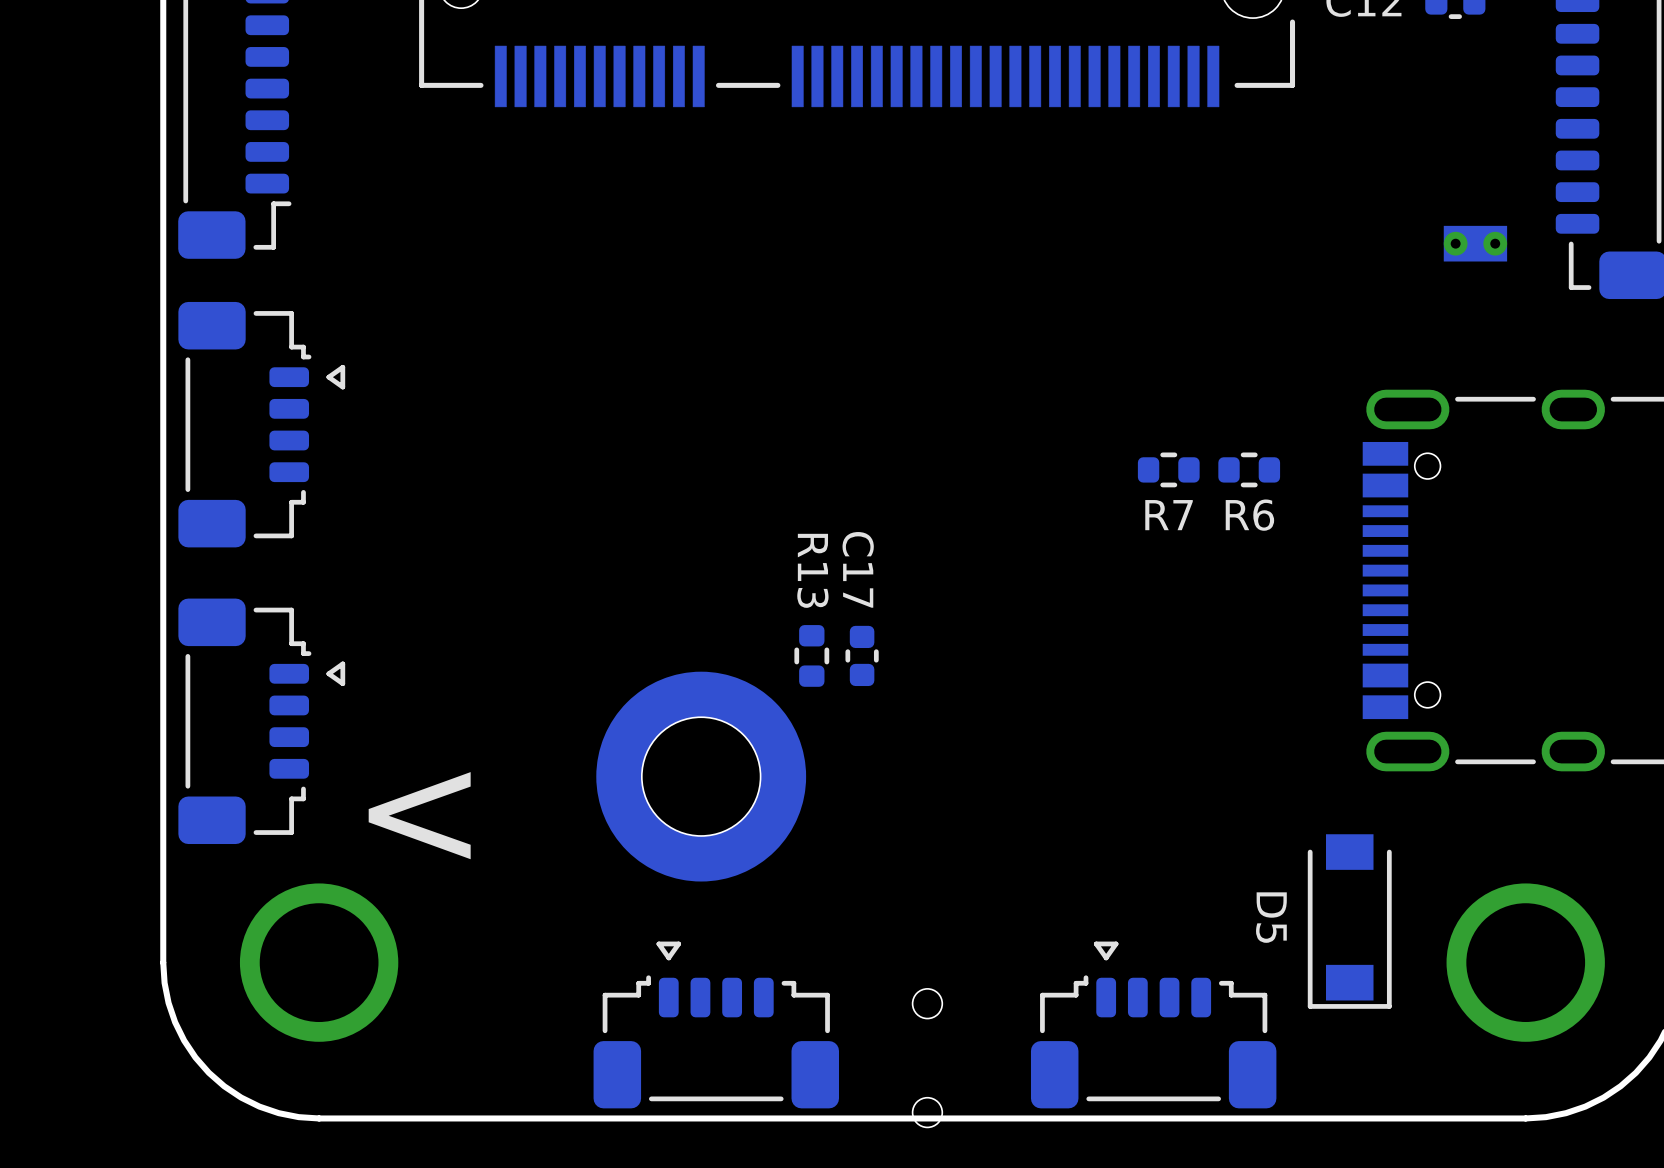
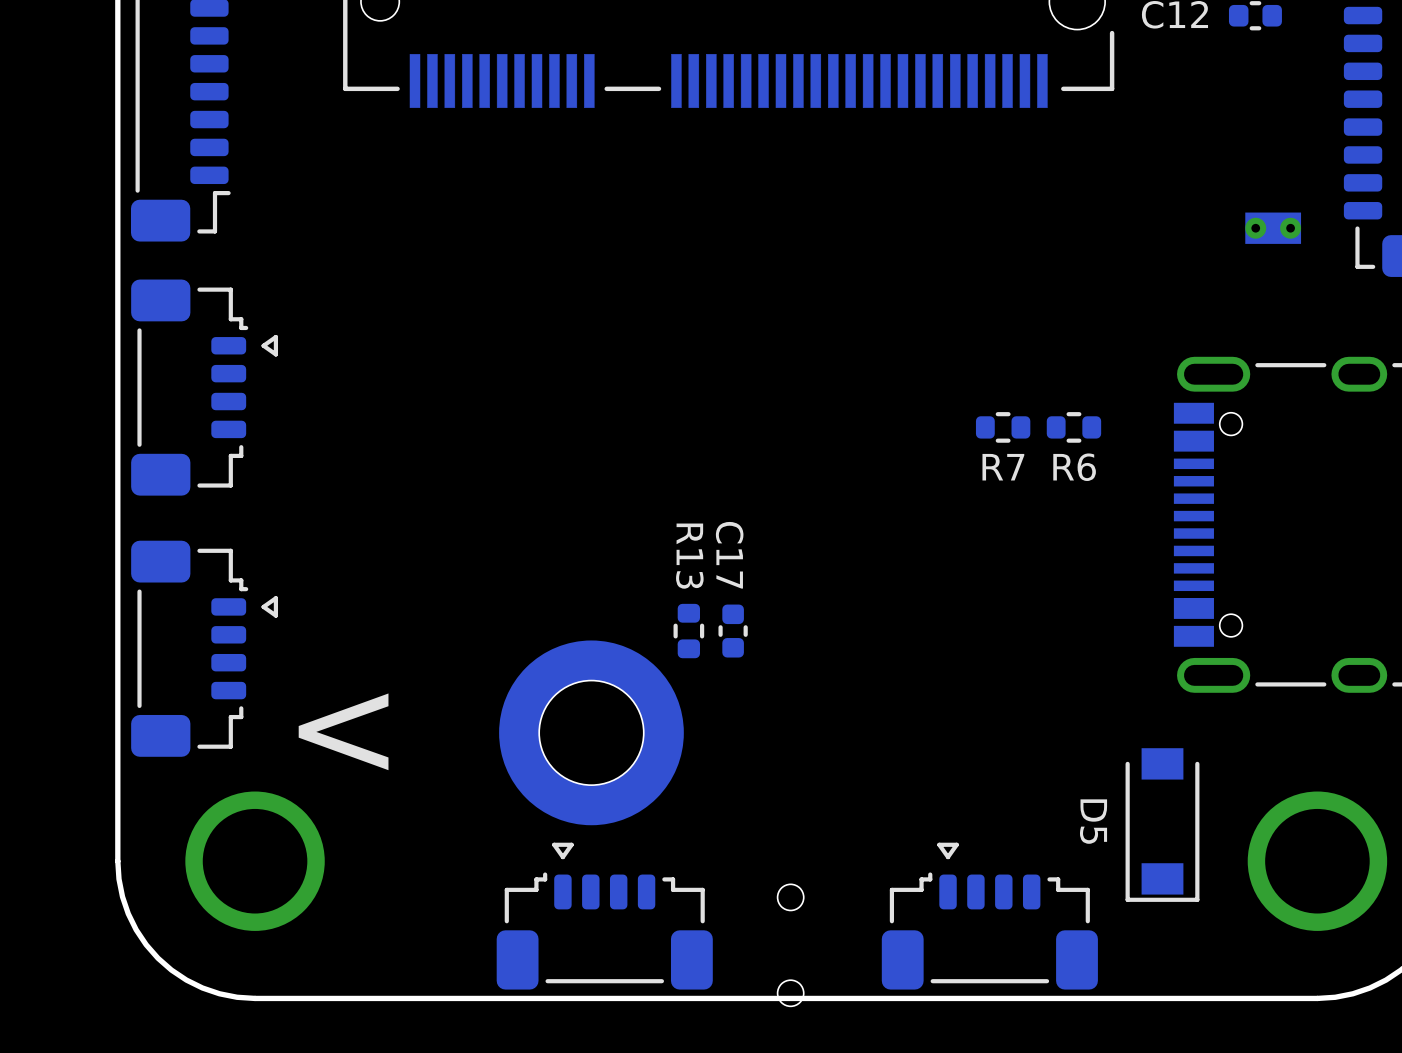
R13 position: (811, 655) -> (688, 631)
C17 position: (862, 655) -> (733, 631)
part position: (701, 776) -> (591, 732)

